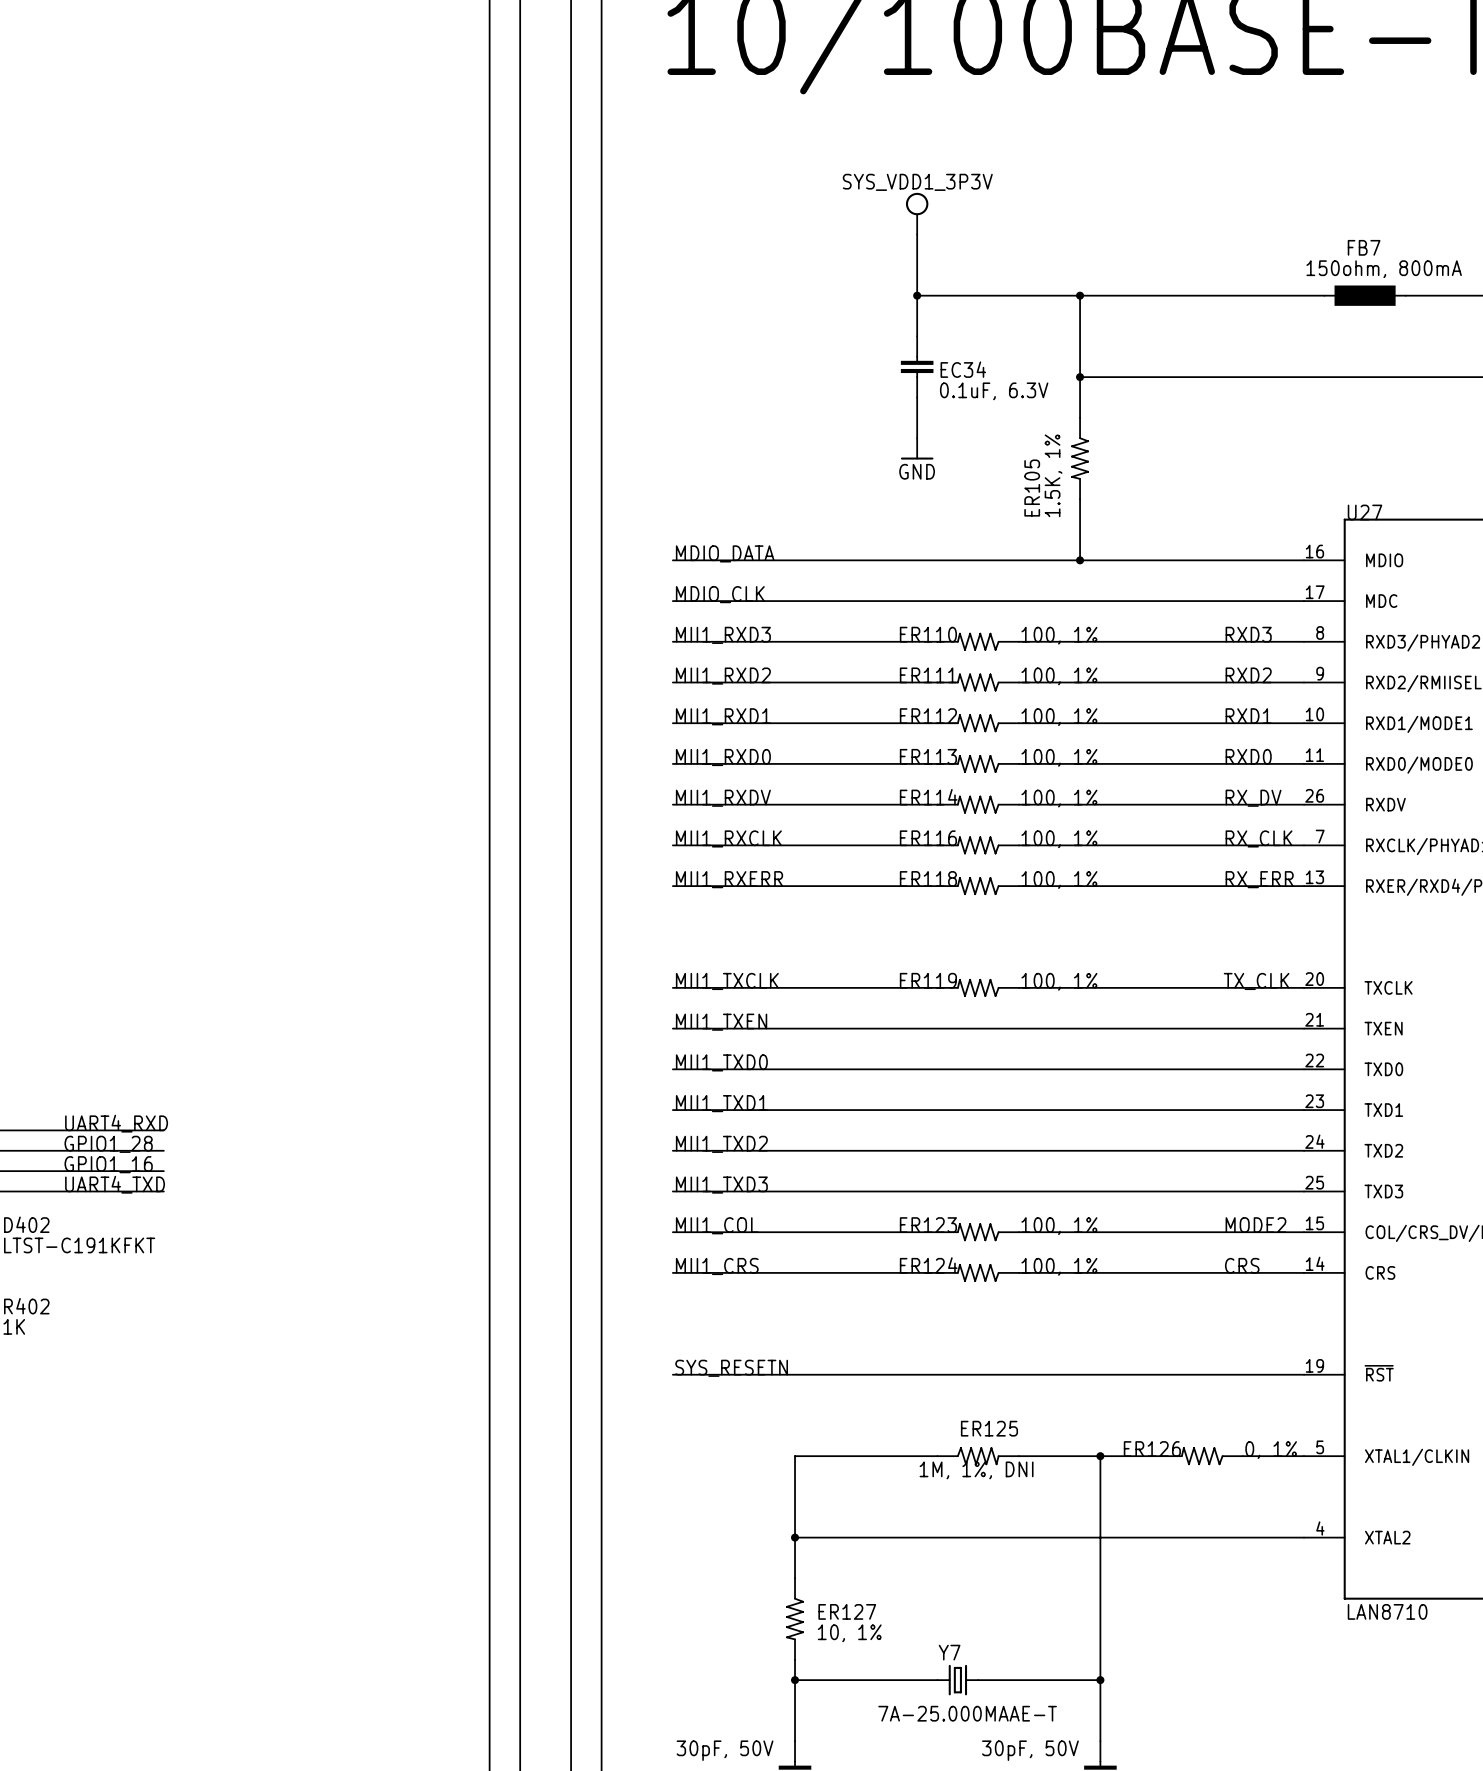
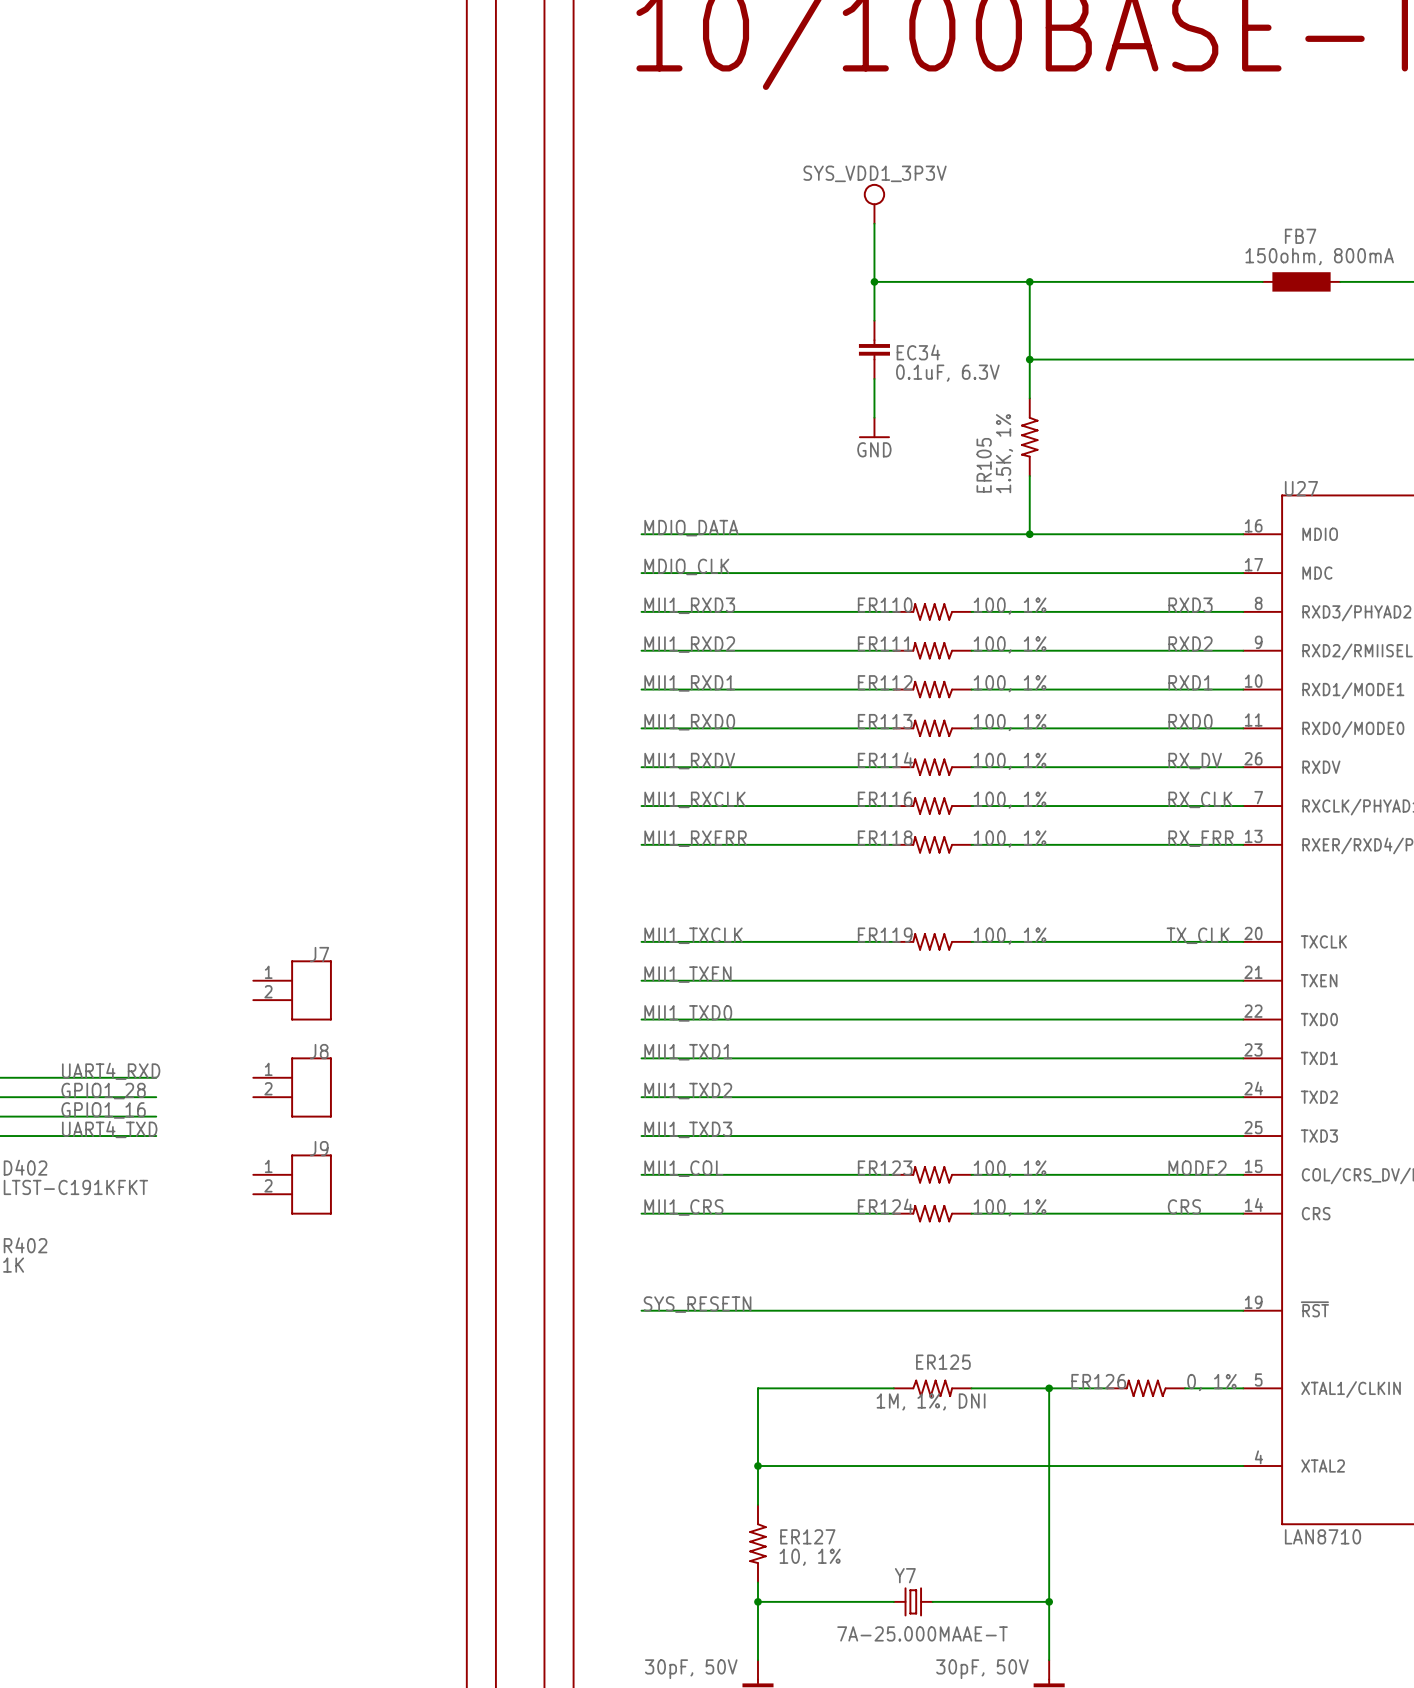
J7: none -> (292, 990)
J8: none -> (292, 1087)
J9: none -> (292, 1184)

